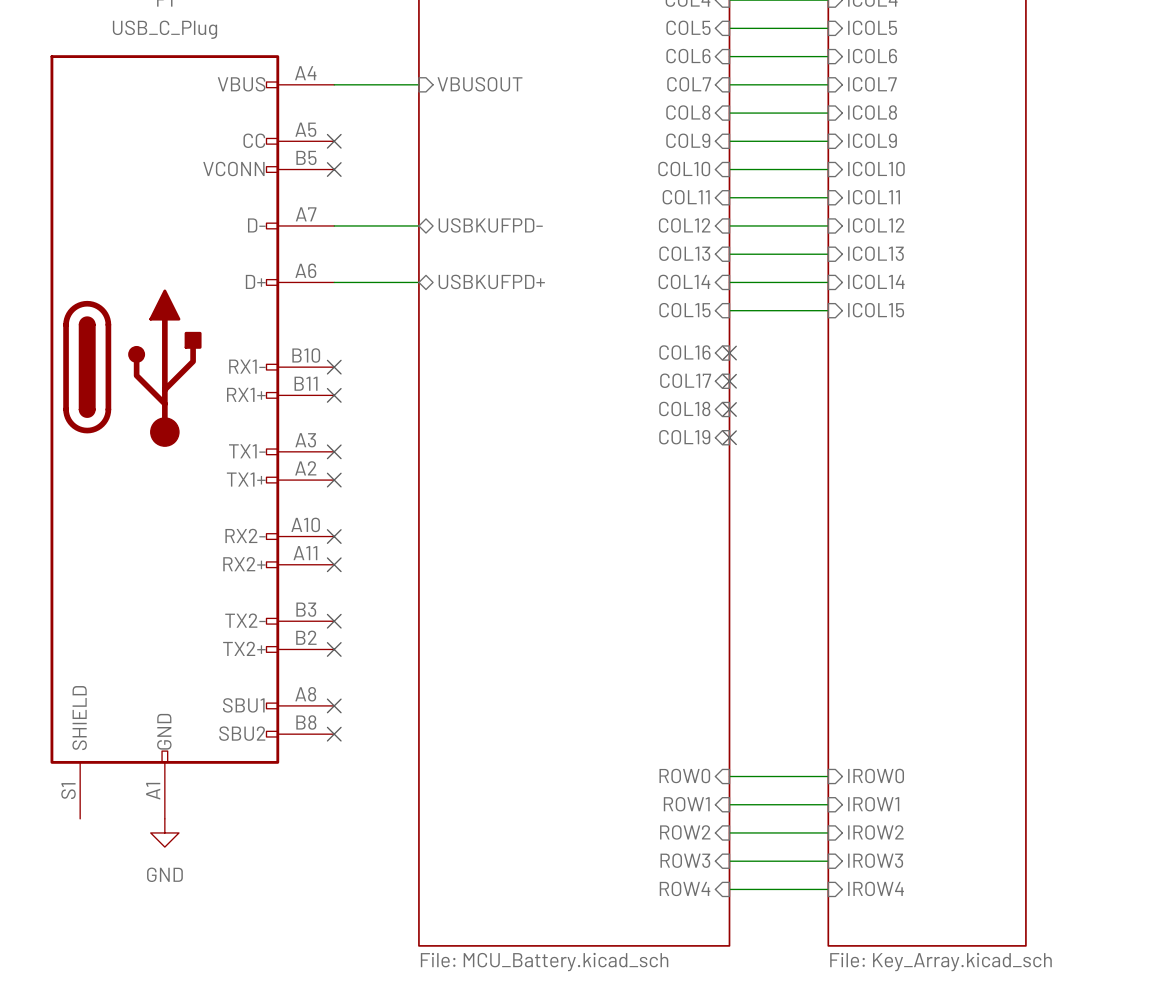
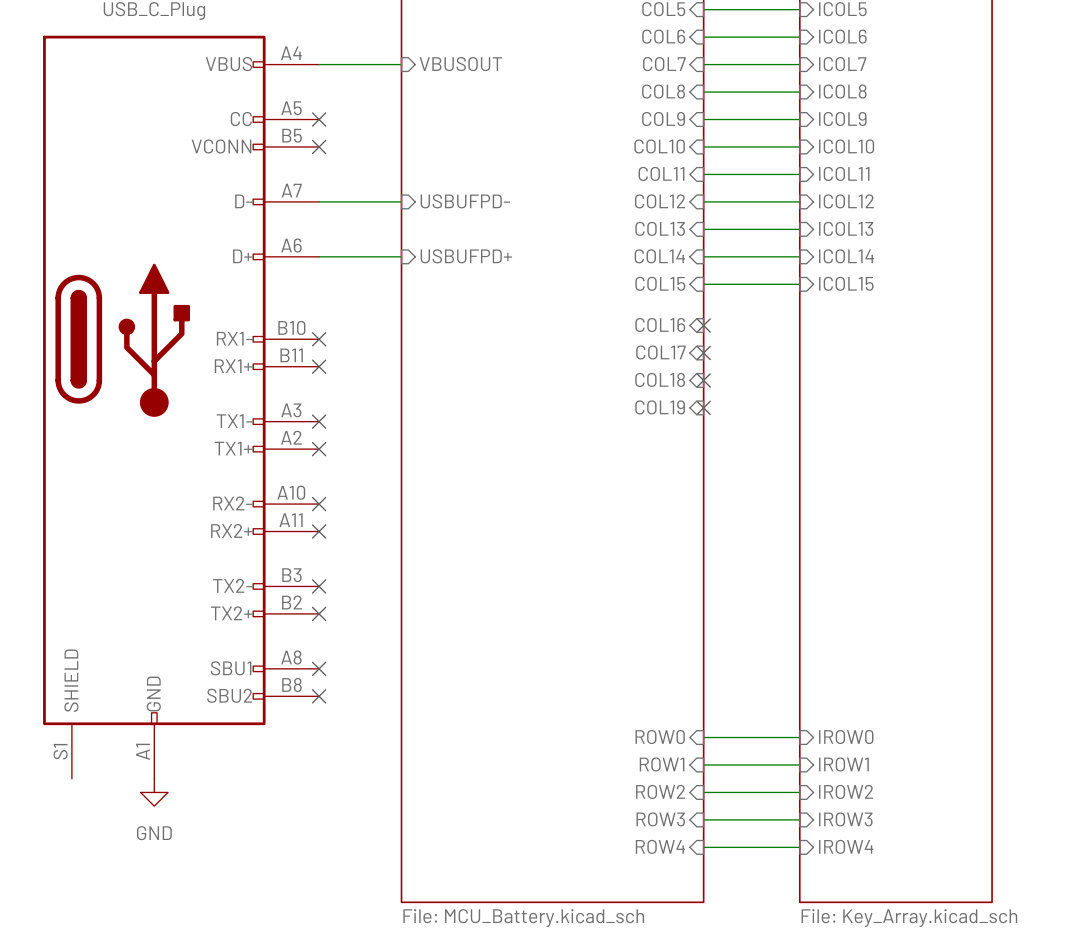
sheet pin shape: bidirectional (490, 225) -> input (465, 201)
sheet pin: USBKUFPD- (490, 225) -> USBUFPD- (465, 201)
sheet pin shape: bidirectional (491, 281) -> input (466, 256)
sheet pin: USBKUFPD+ (491, 281) -> USBUFPD+ (466, 256)

